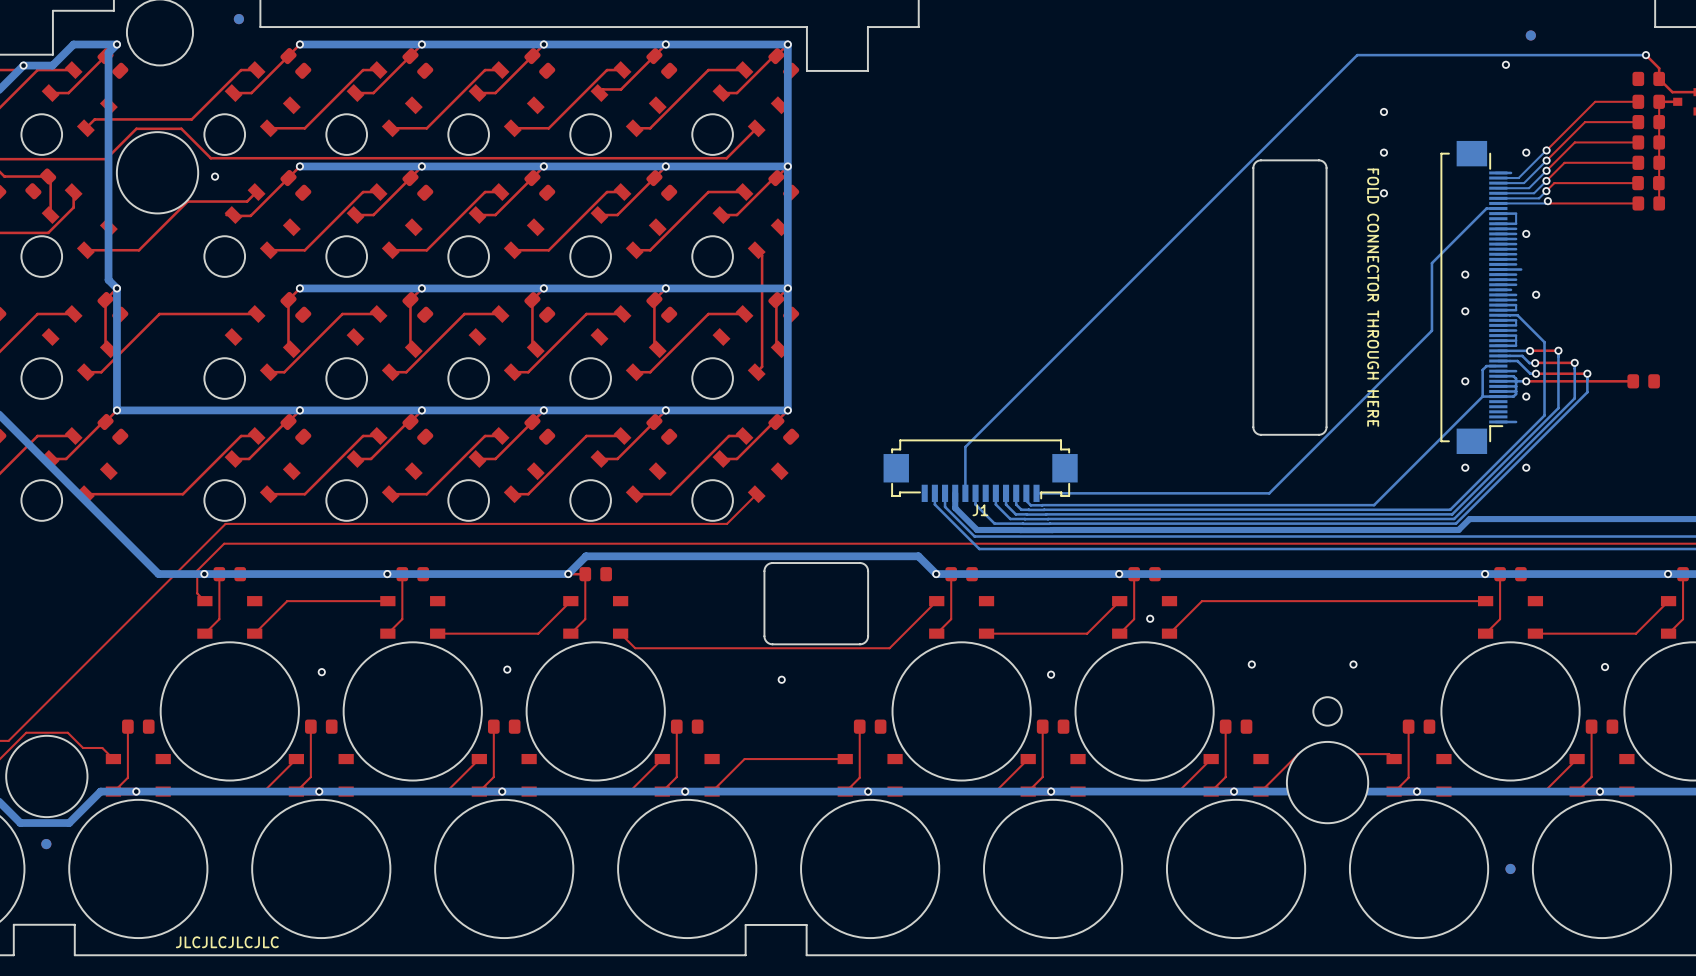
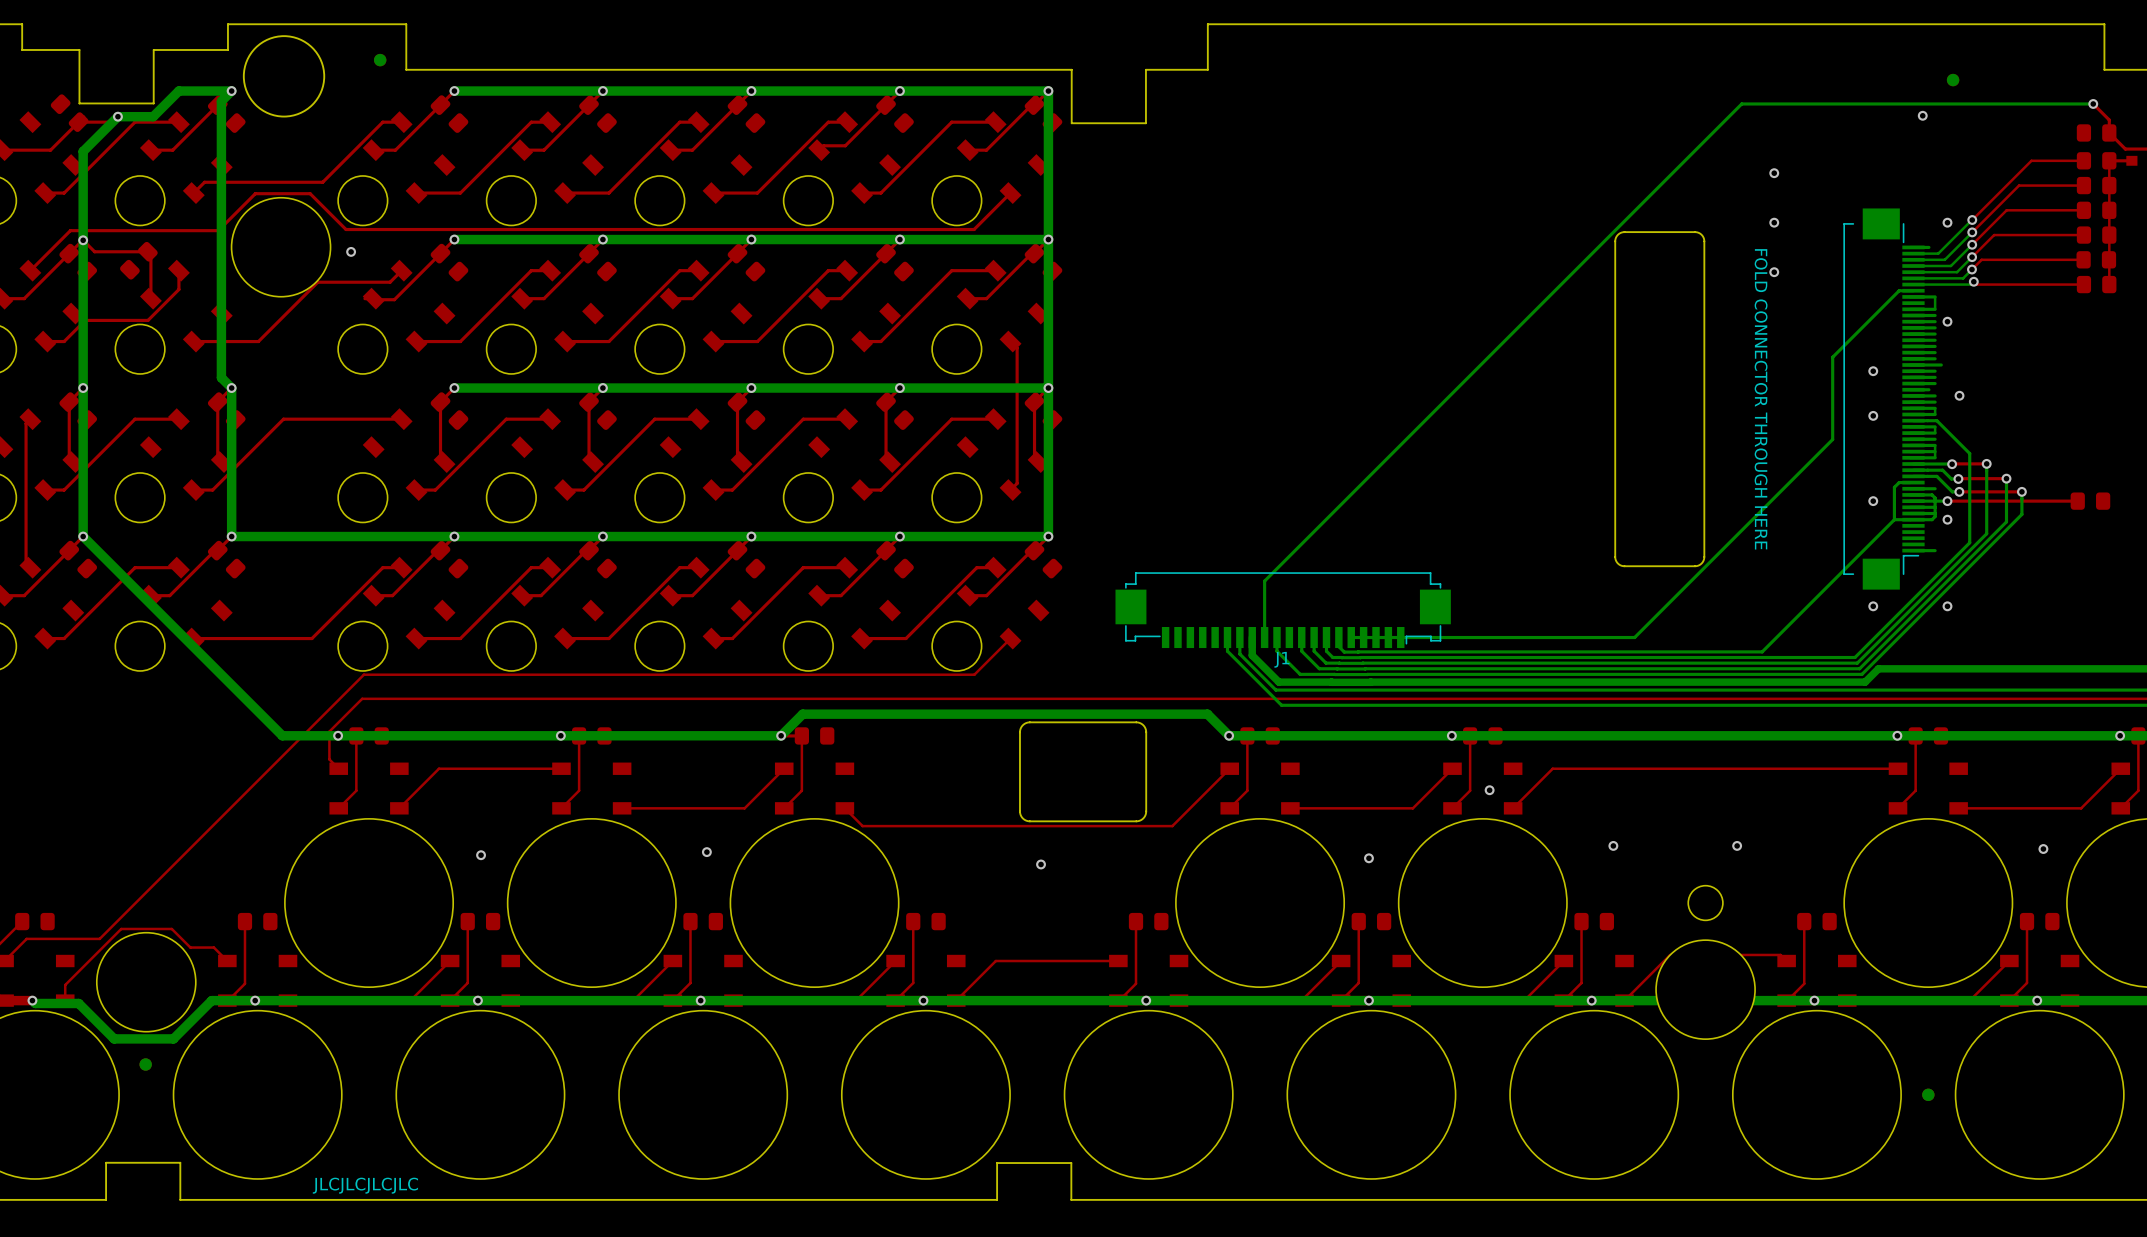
J1 footprint: [883, 439, 1078, 502] -> [1115, 572, 1451, 649]

